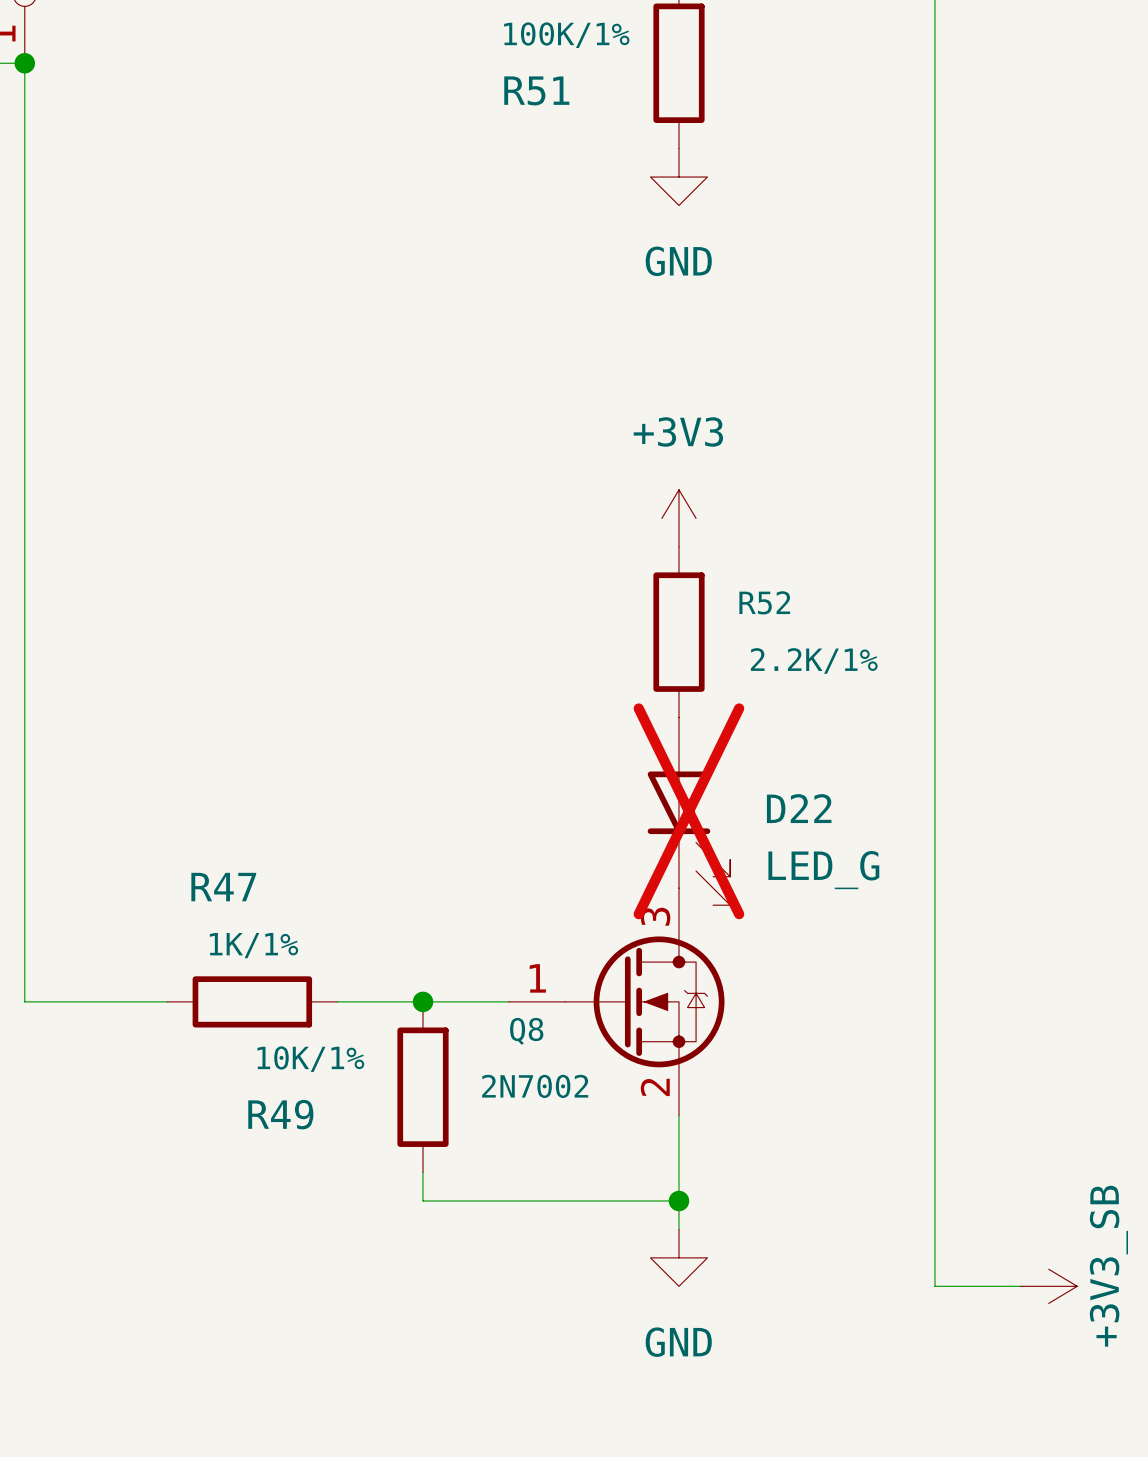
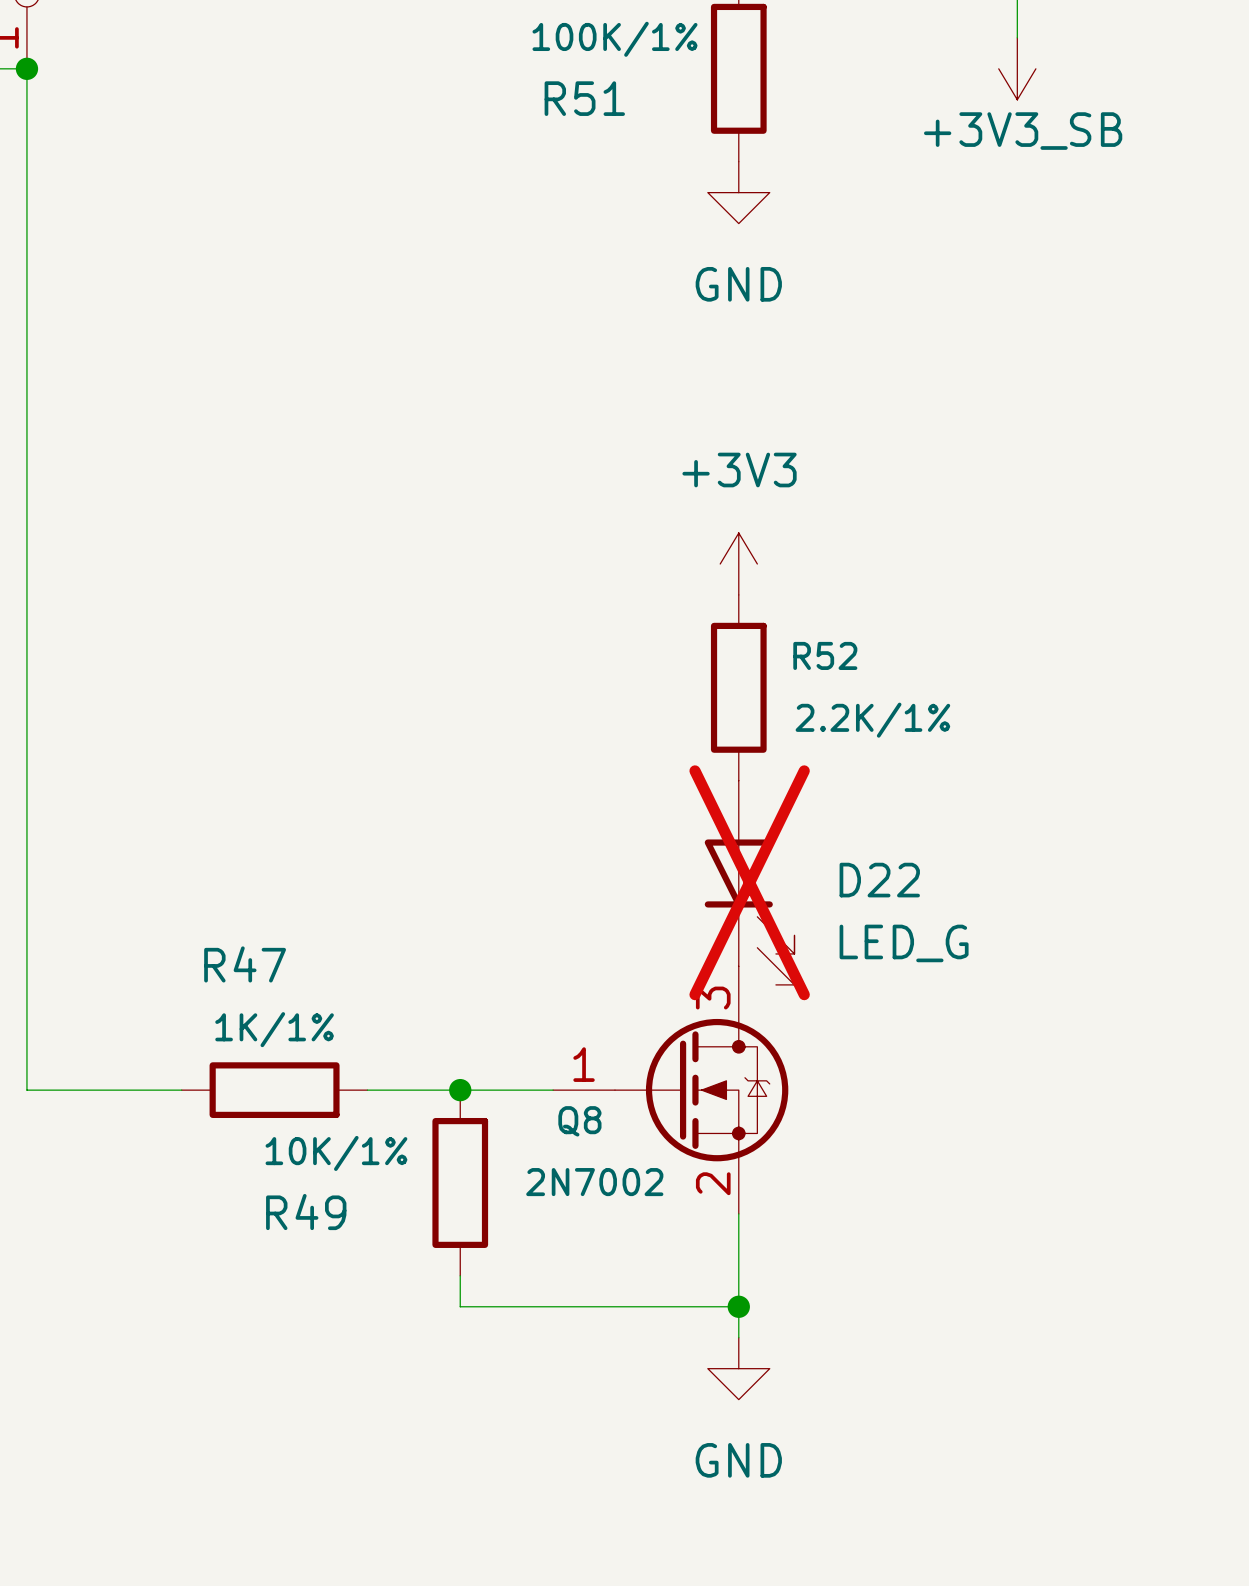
wire: (934, 34) (934, 1286) (1020, 1286) -> none
power symbol: none -> +3V3_SB (1017, 68)
power symbol: +3V3_SB (1048, 1286) -> none

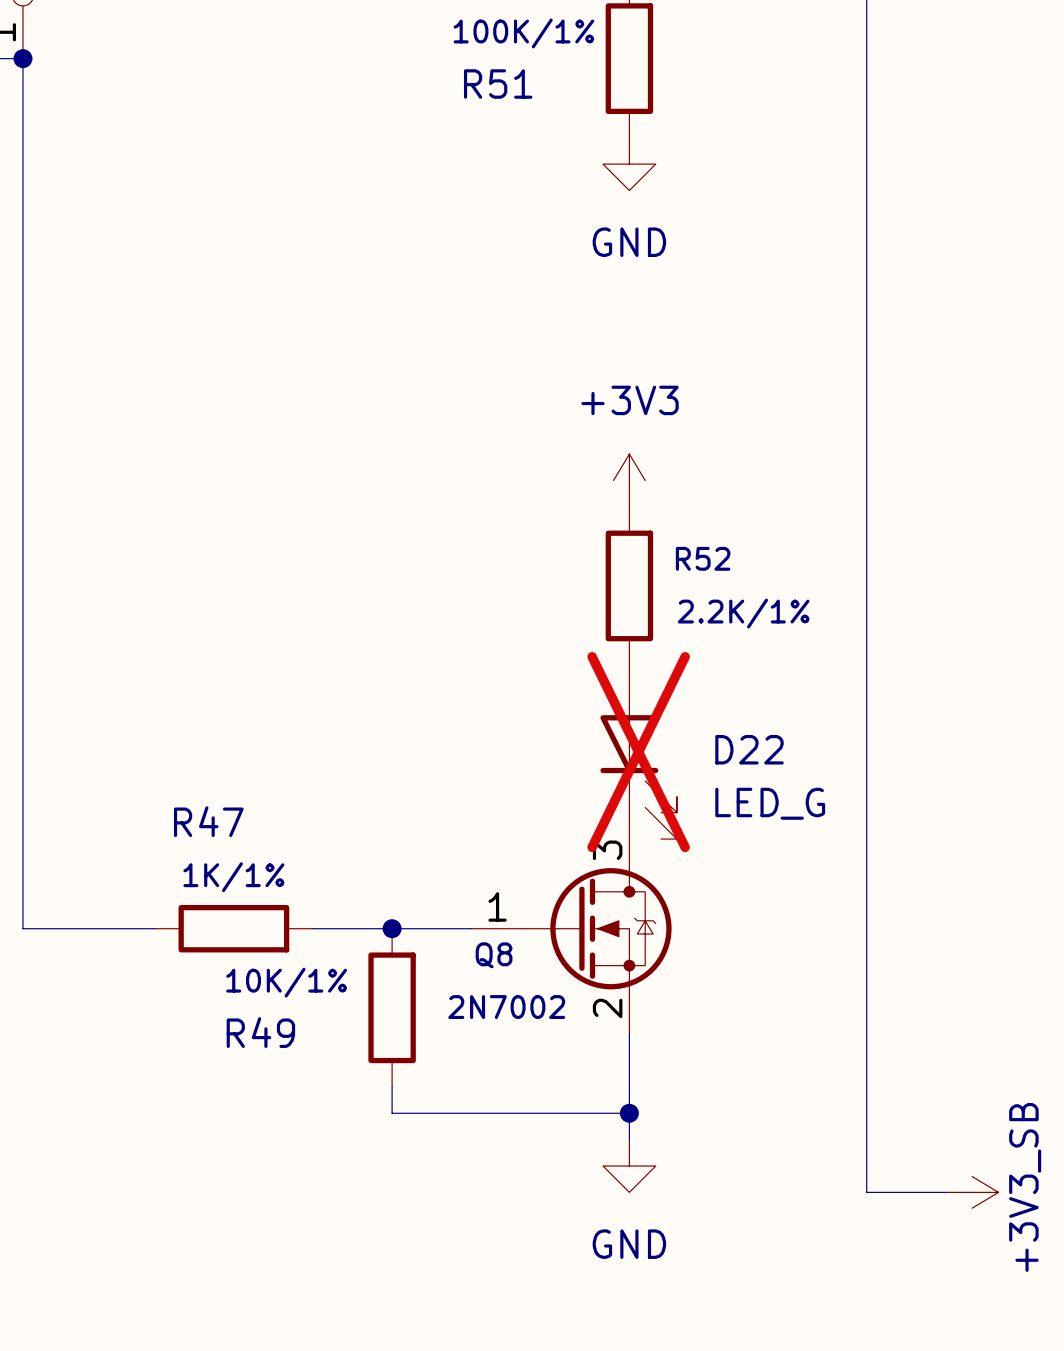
wire: none -> (866, 32) (866, 1192) (945, 1192)
power symbol: +3V3_SB (1017, 68) -> none
power symbol: none -> +3V3_SB (972, 1192)

